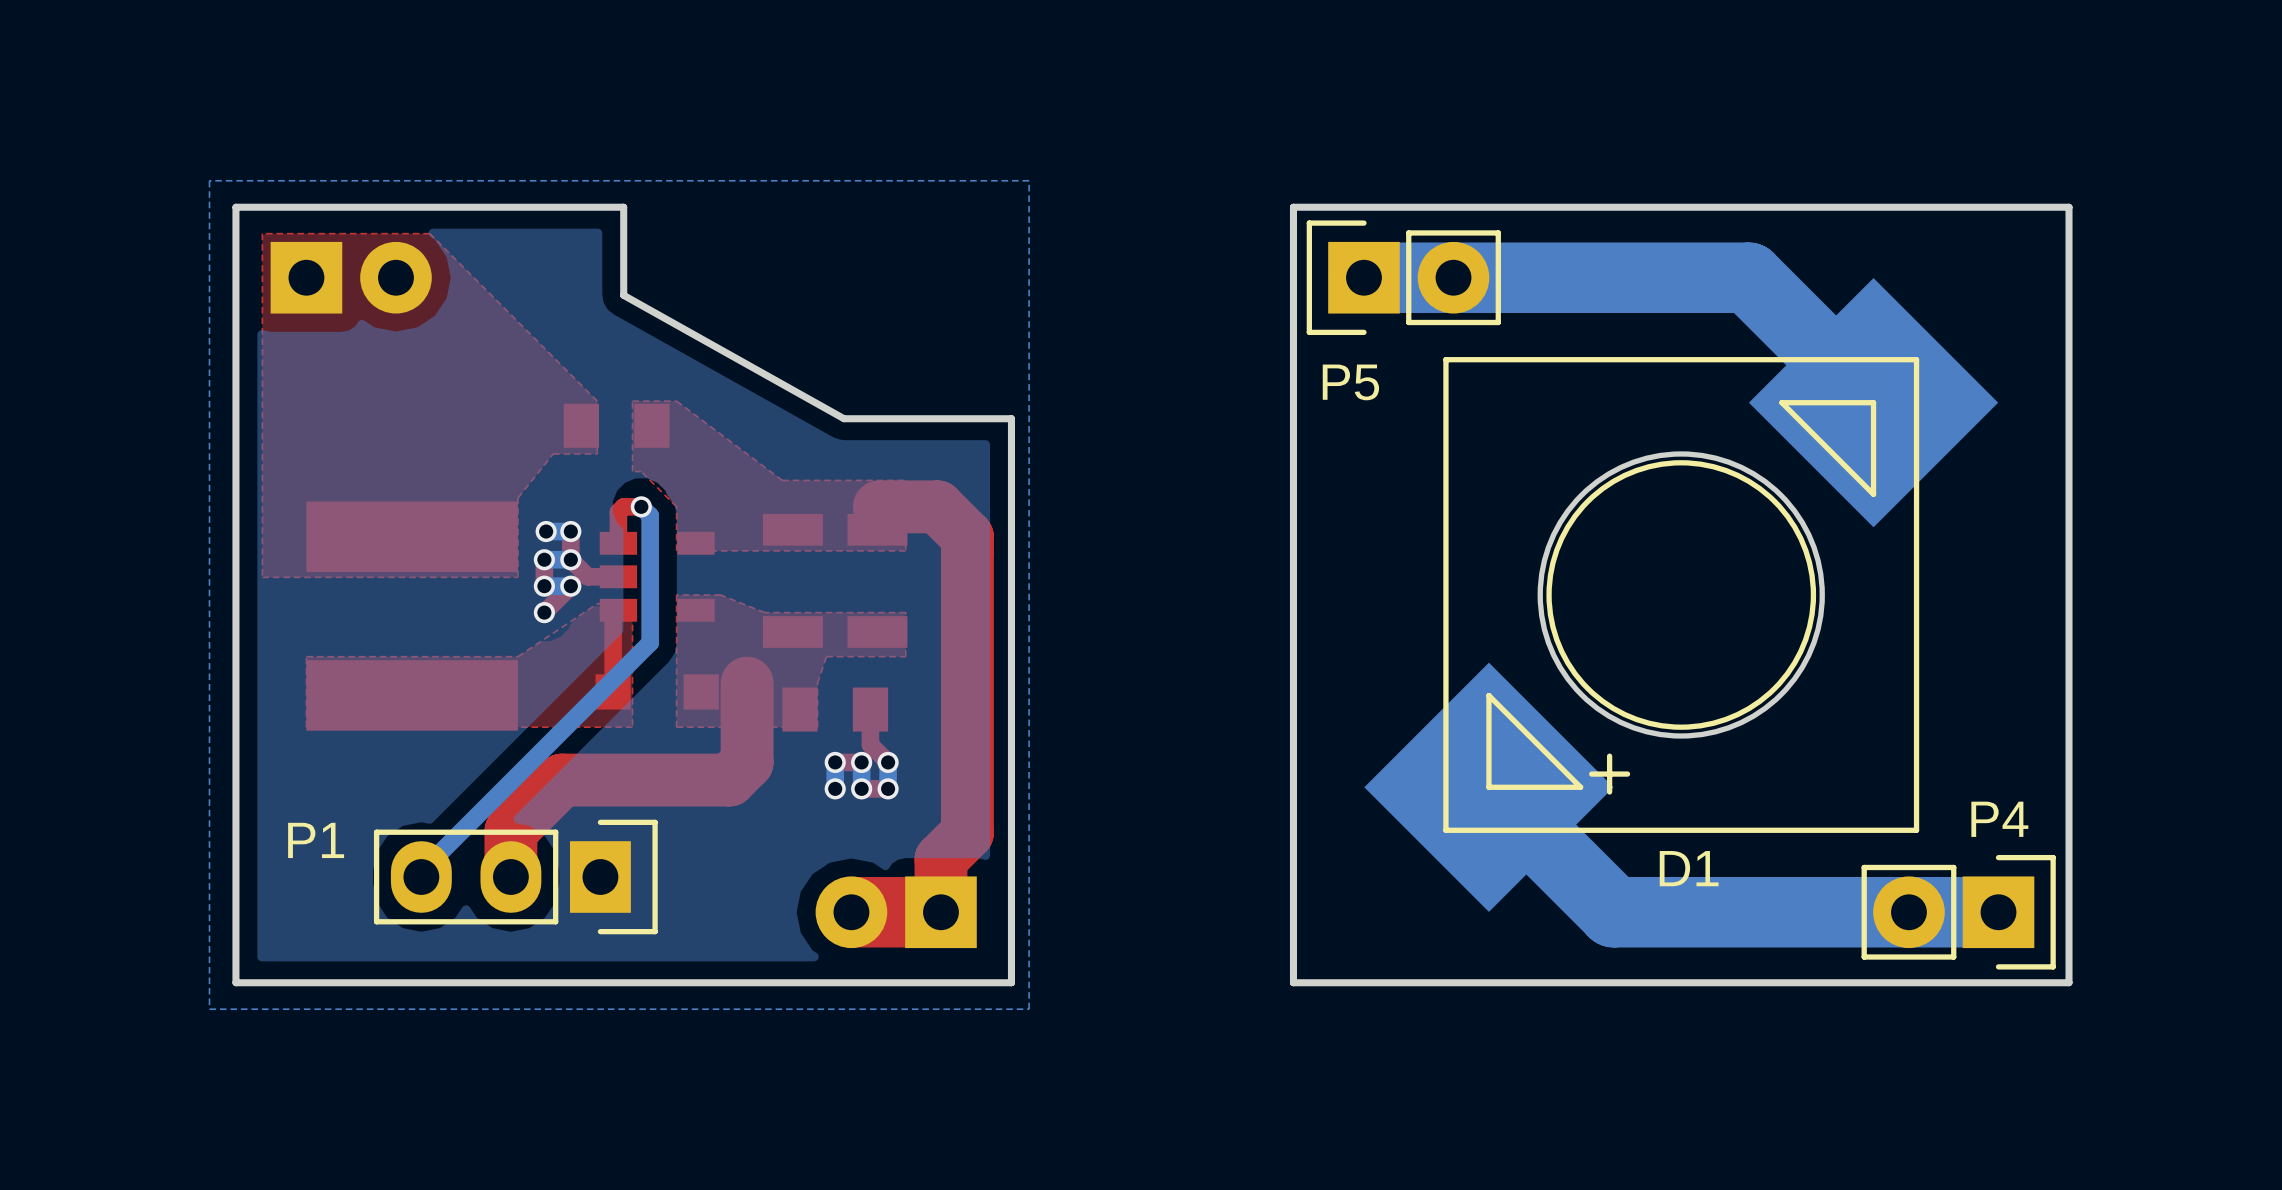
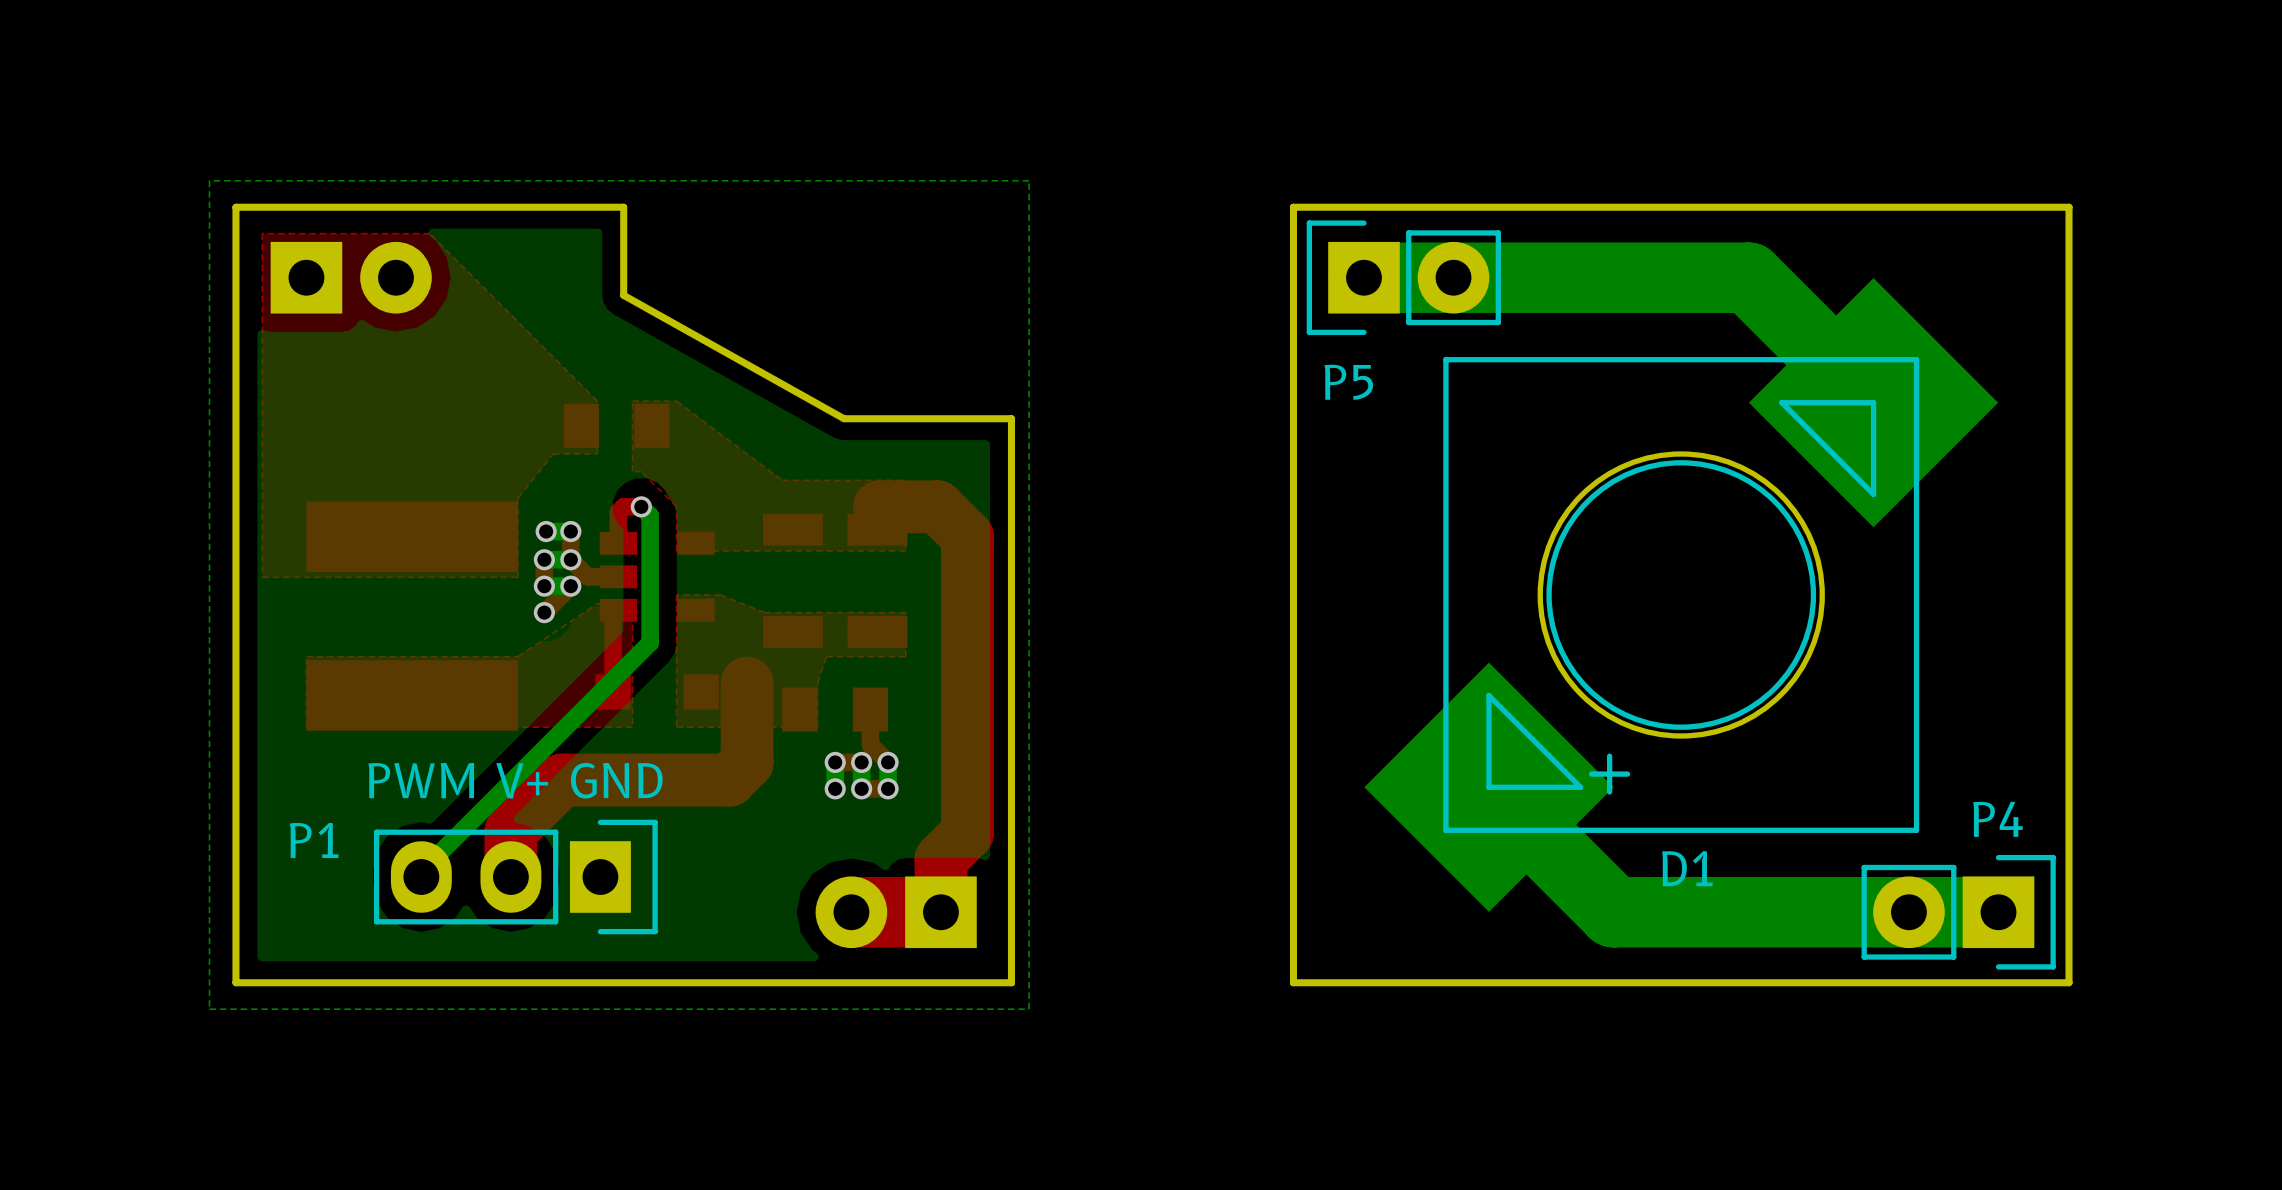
text: none -> PWM V+ GND (515, 780)

